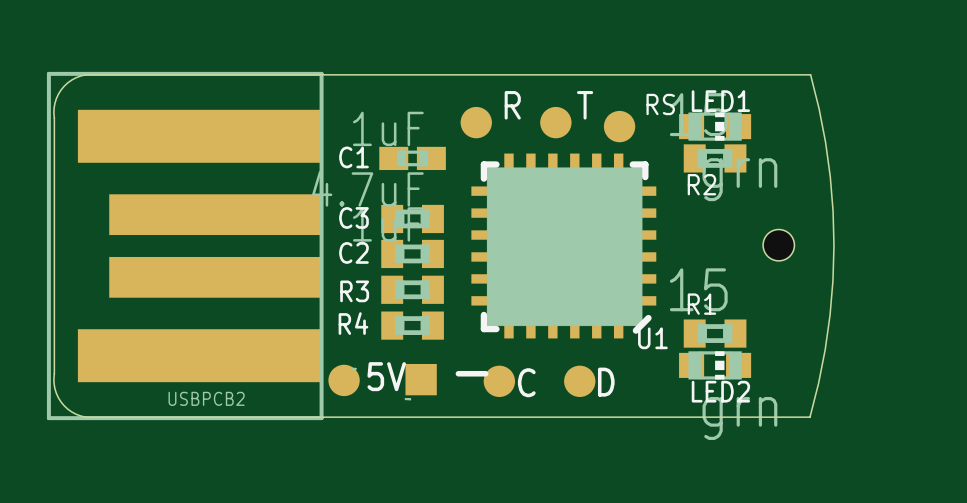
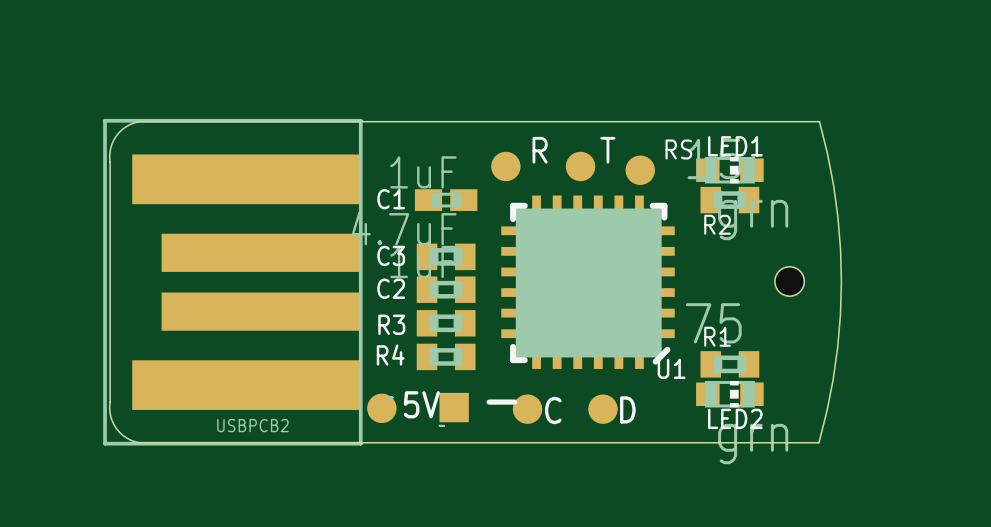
R1 value: 15 (698, 289) -> 75 (713, 323)

